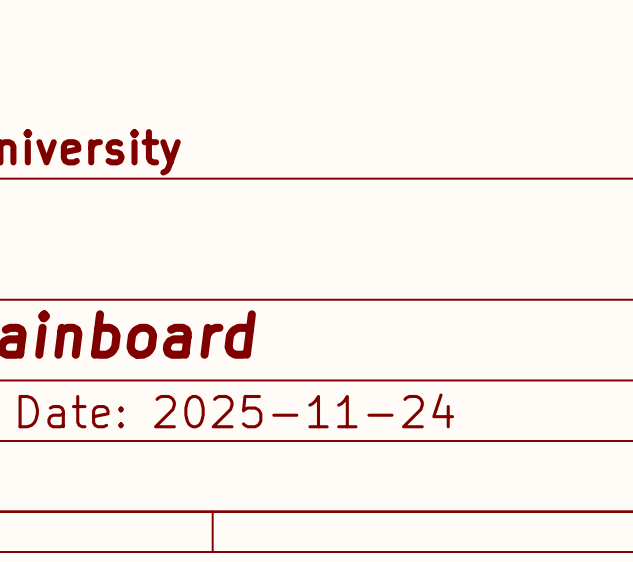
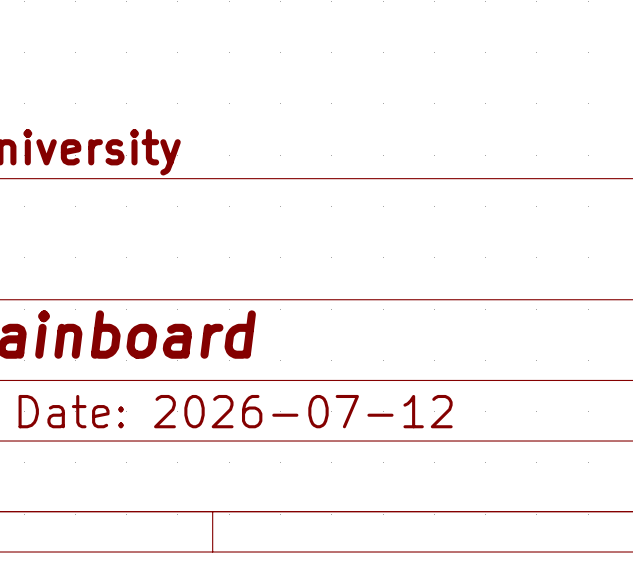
title block: Date: 2025-11-24 (236, 410) -> Date: 2026-07-12 (235, 411)

